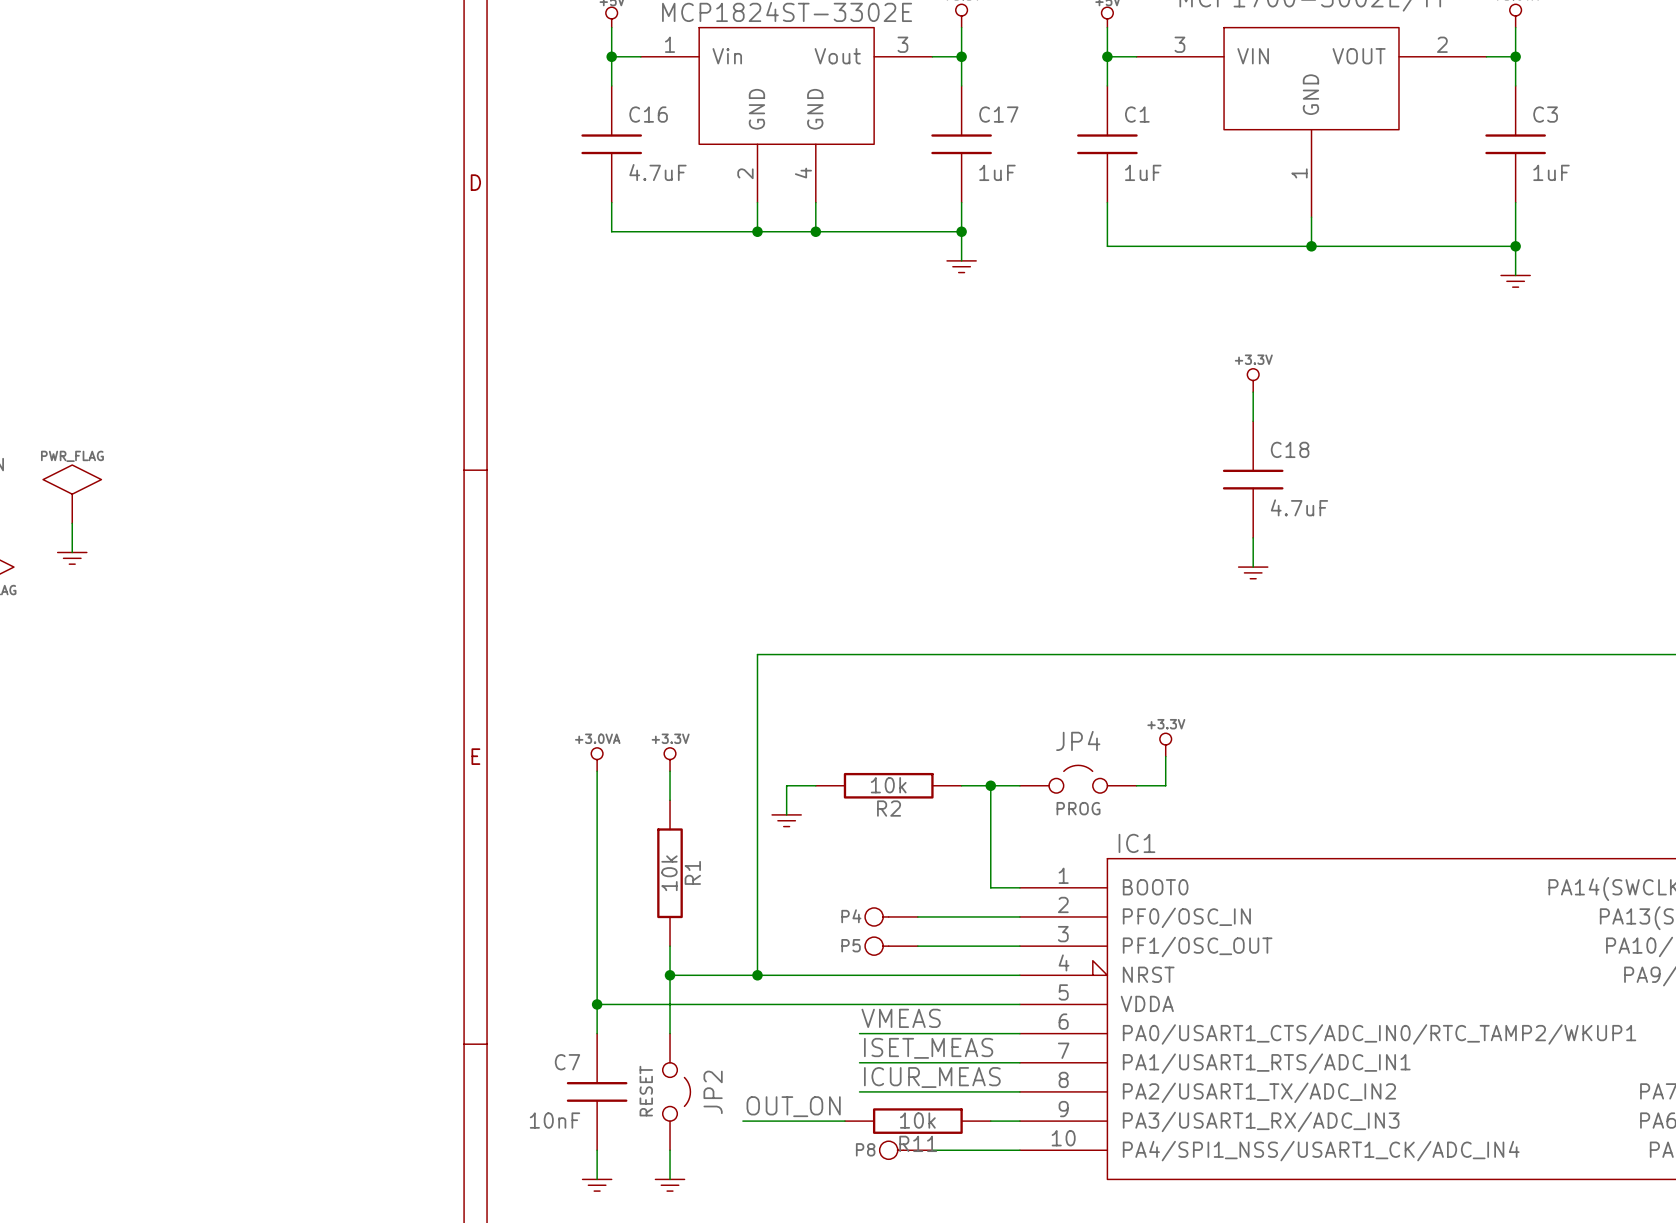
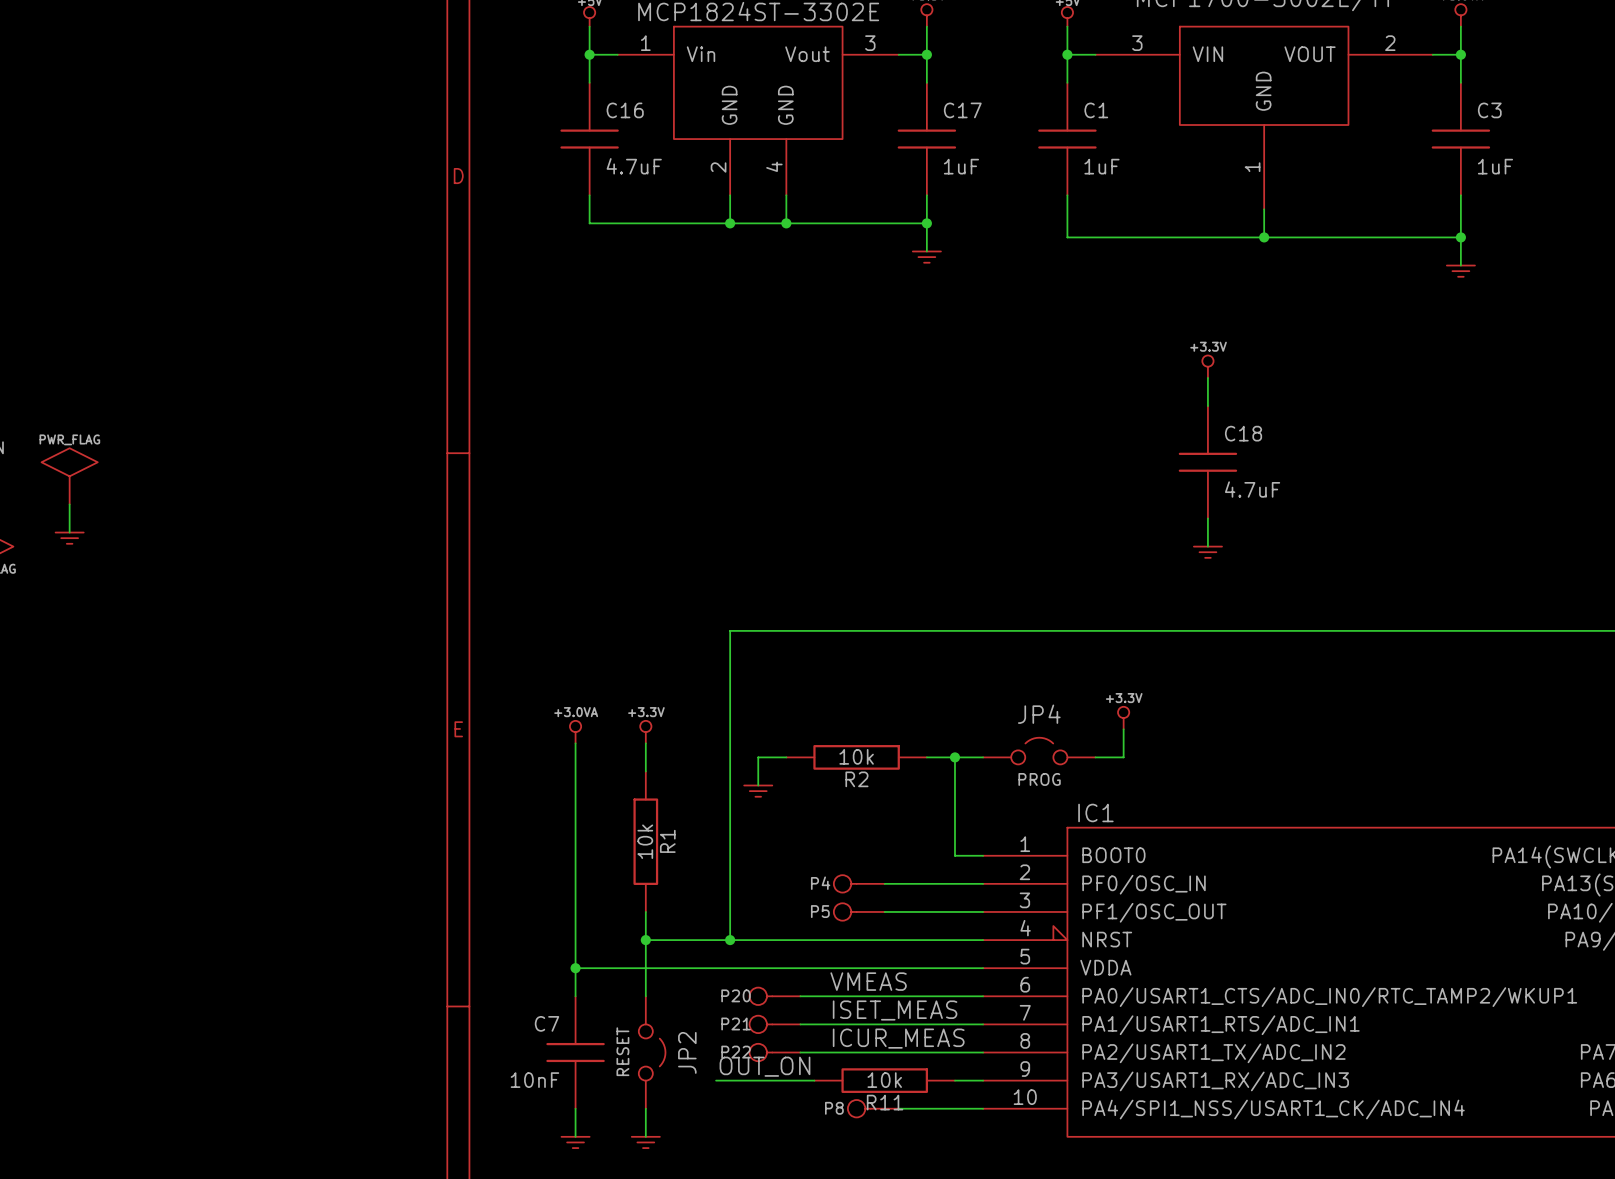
P20: none -> (774, 996)
wire: none -> (800, 996) (828, 996)
P21: none -> (774, 1024)
wire: none -> (800, 1024) (828, 1024)
P22: none -> (774, 1052)
wire: none -> (800, 1052) (828, 1052)

